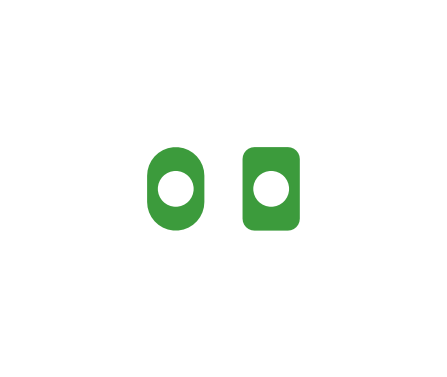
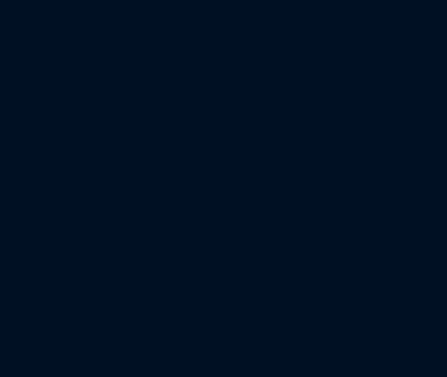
part: (223, 188) -> none

